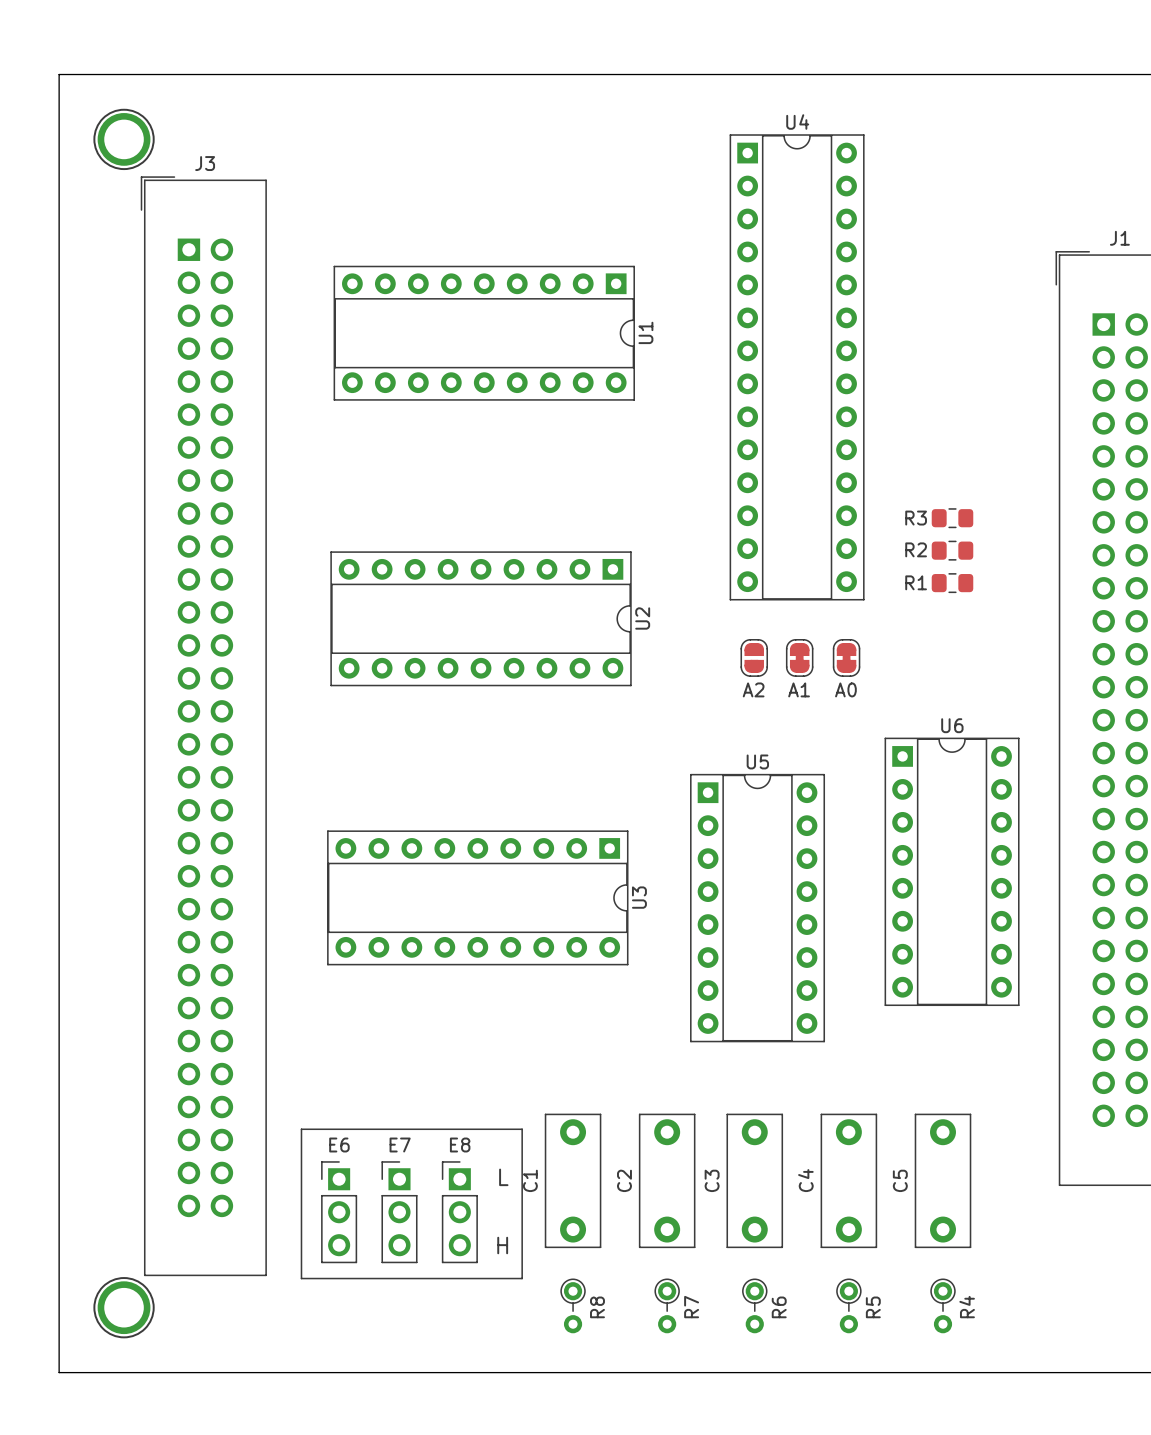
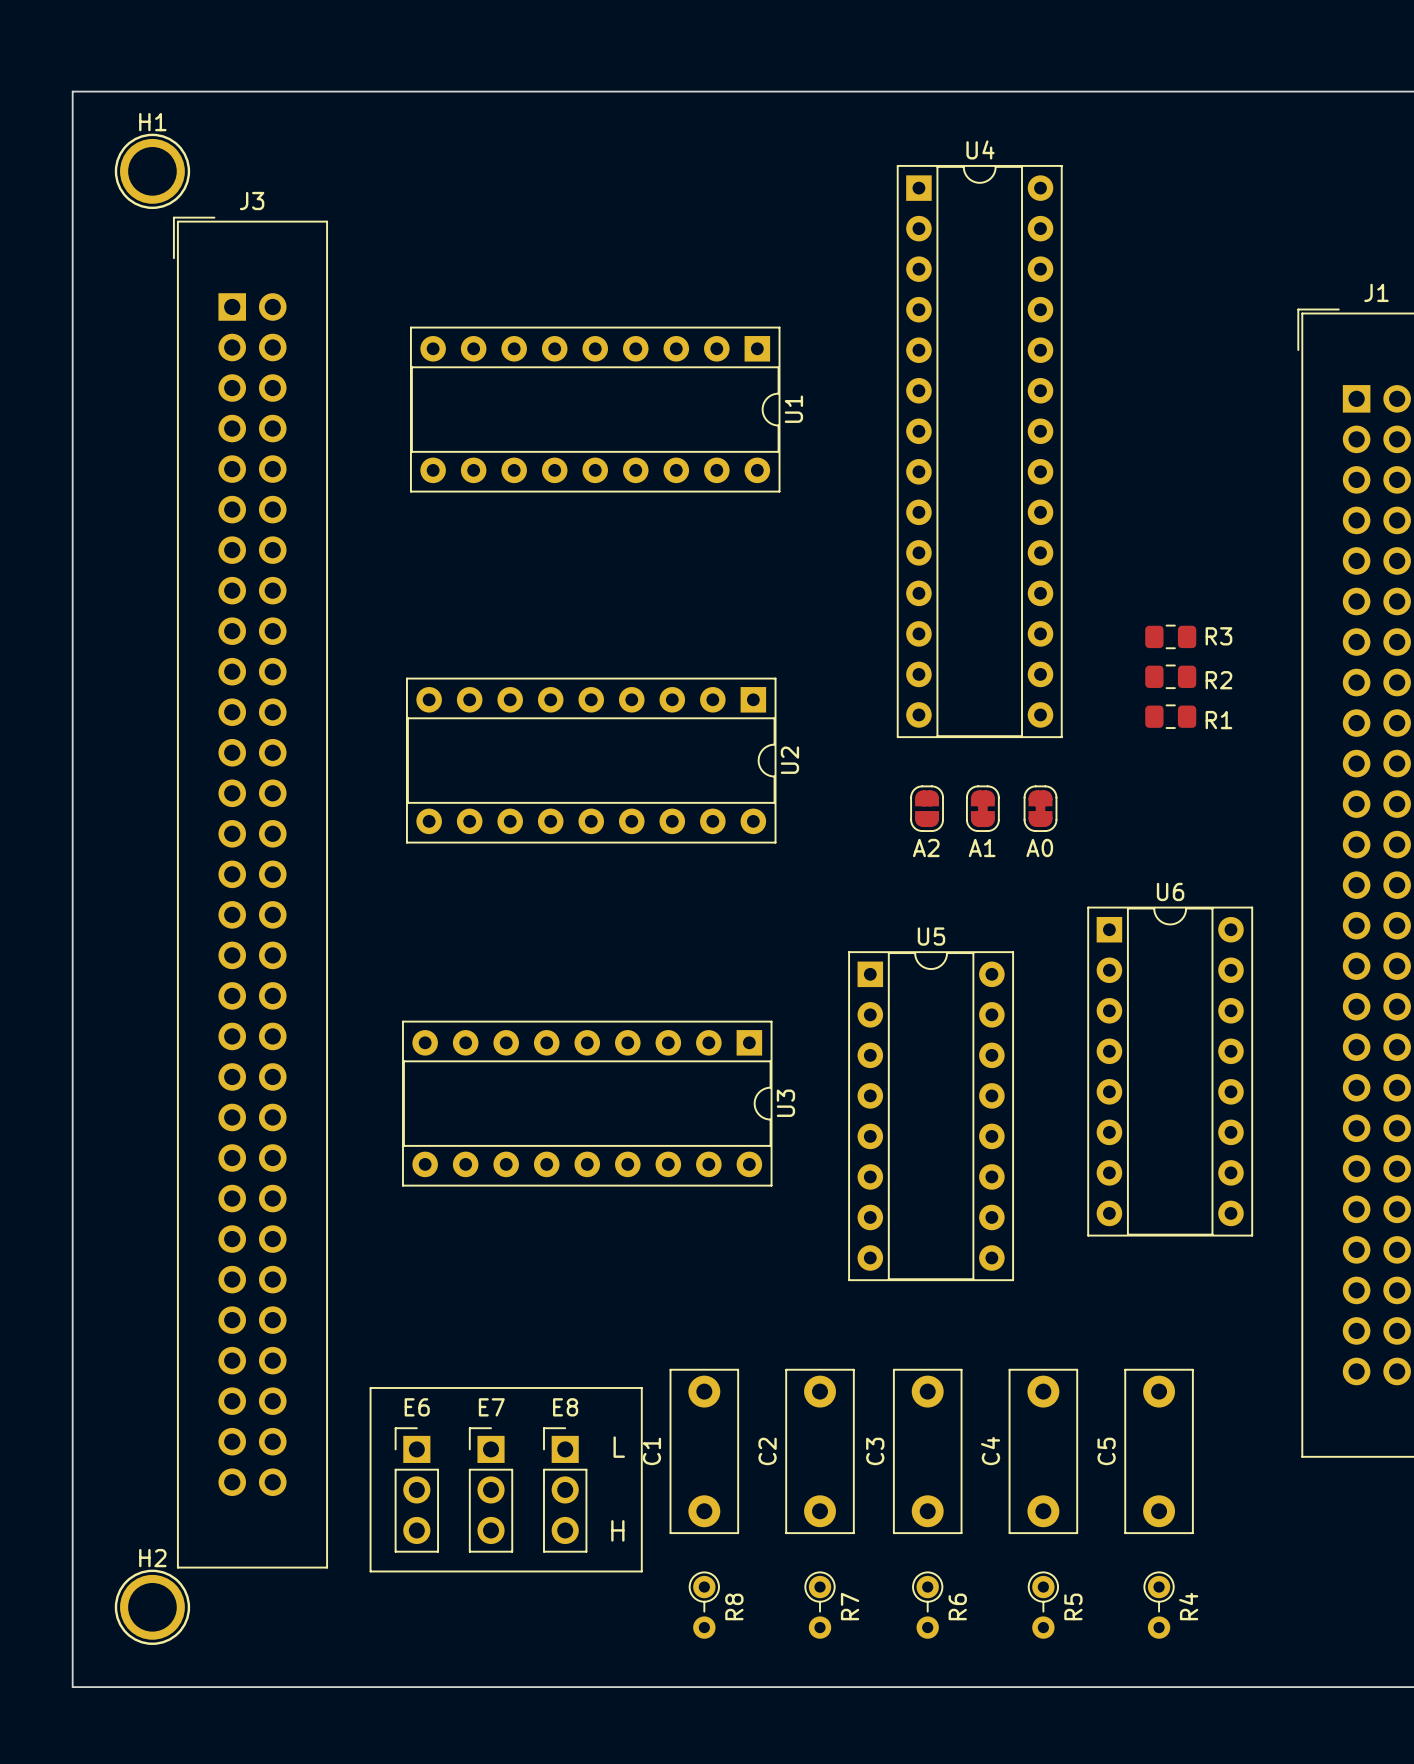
H1 name: none -> H1 (152, 122)
R3 name position: R3 (916, 518) -> R3 (1218, 636)
R2 name position: R2 (916, 549) -> R2 (1218, 680)
R1 name position: R1 (916, 582) -> R1 (1218, 720)
H2 name: none -> H2 (152, 1558)

